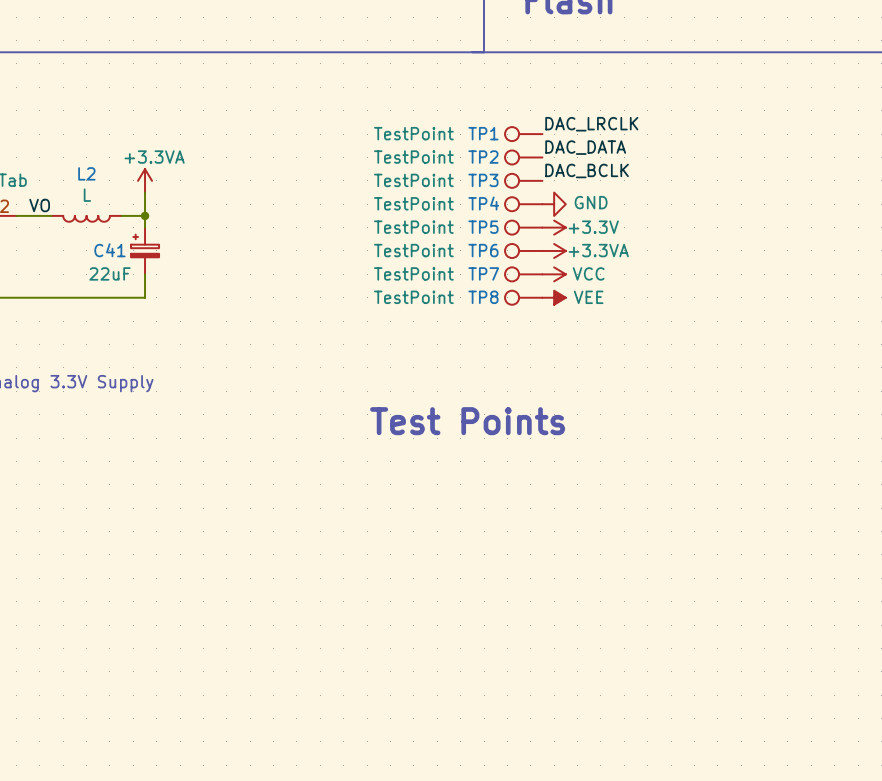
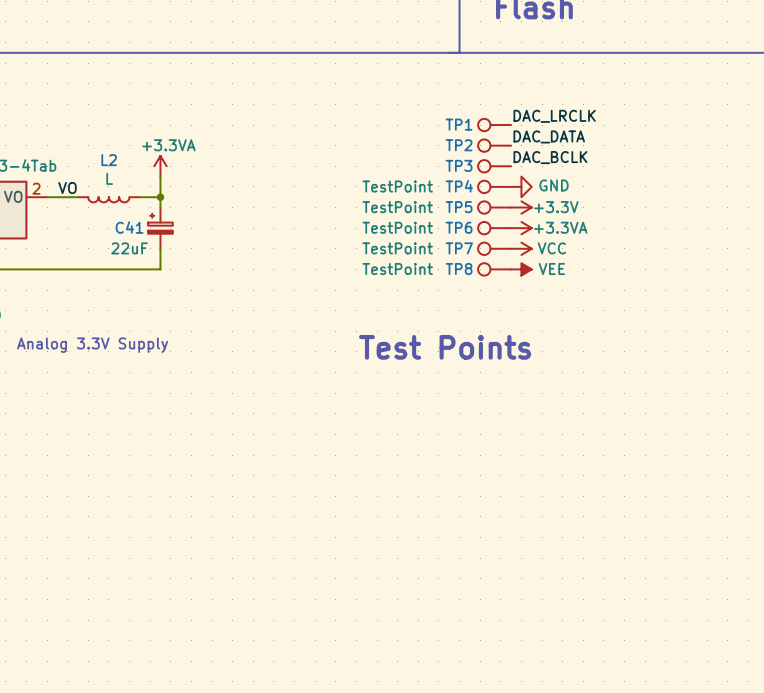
TP1 value: TestPoint (413, 133) -> none
TP2 value: TestPoint (413, 157) -> none
TP3 value: TestPoint (413, 180) -> none
text position: Test Points (467, 421) -> Test Points (445, 347)

